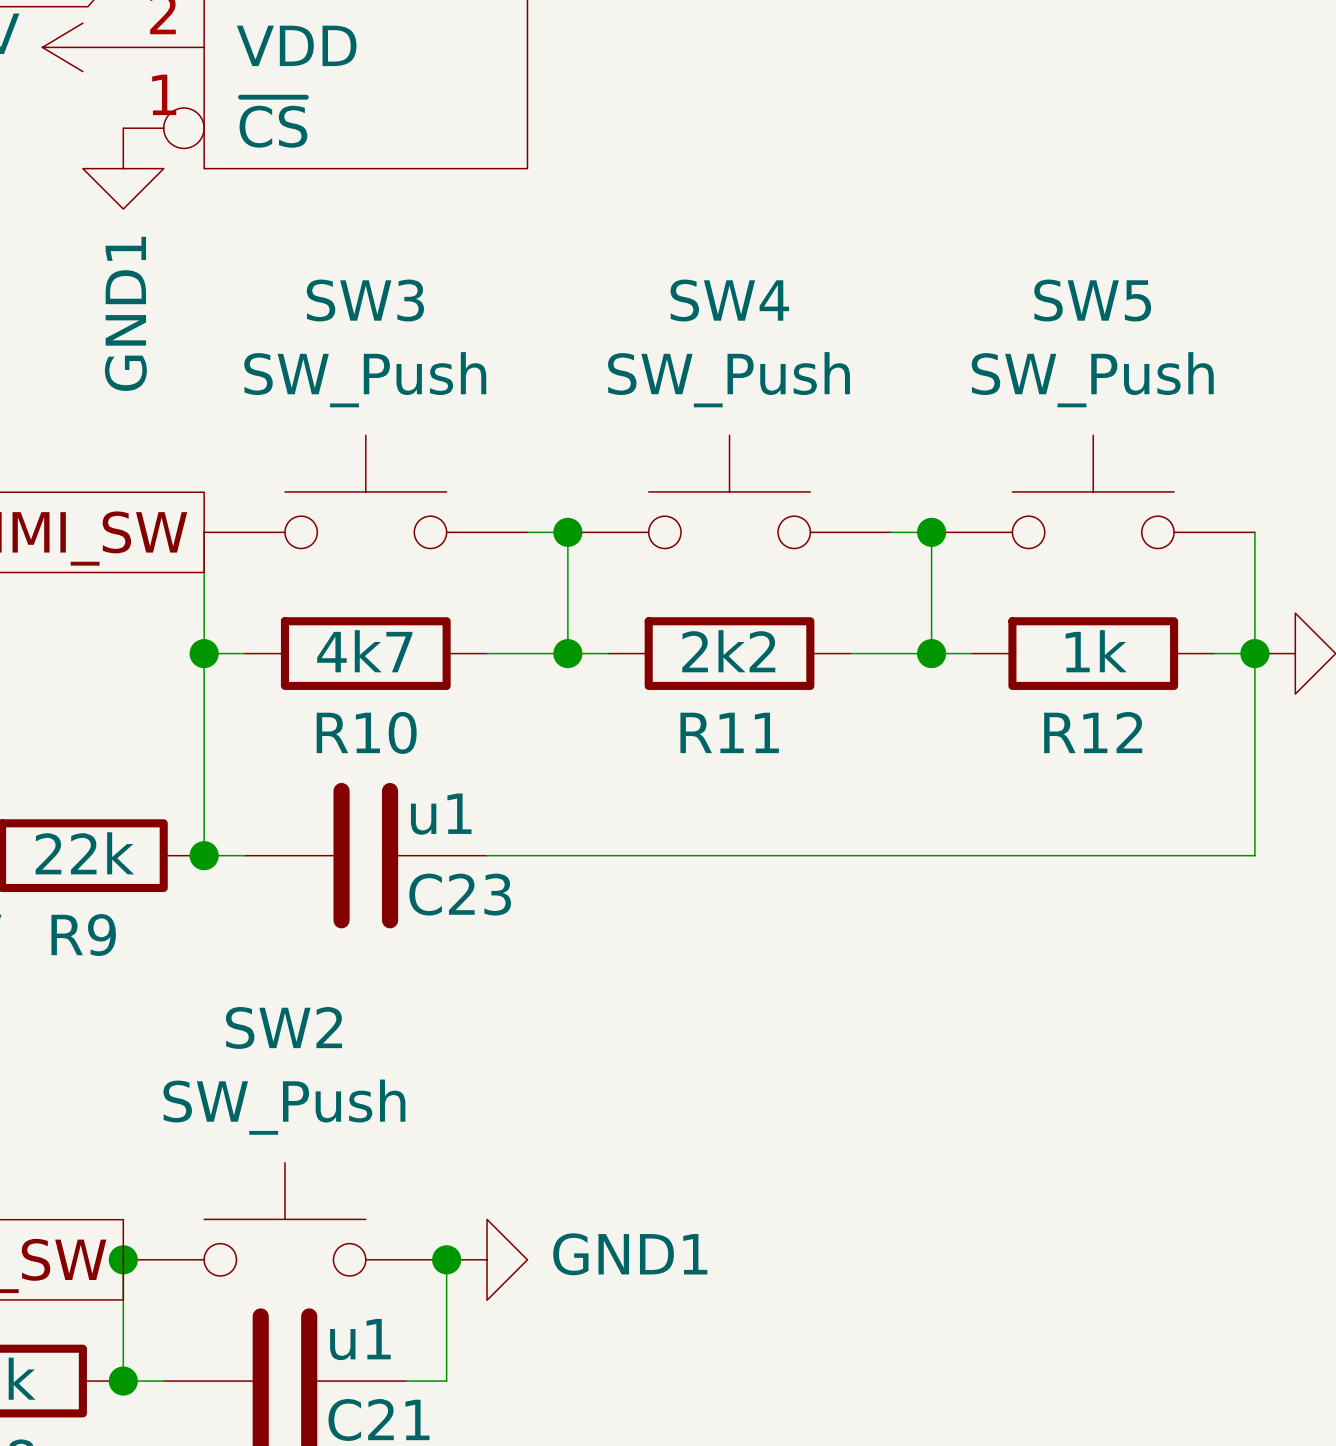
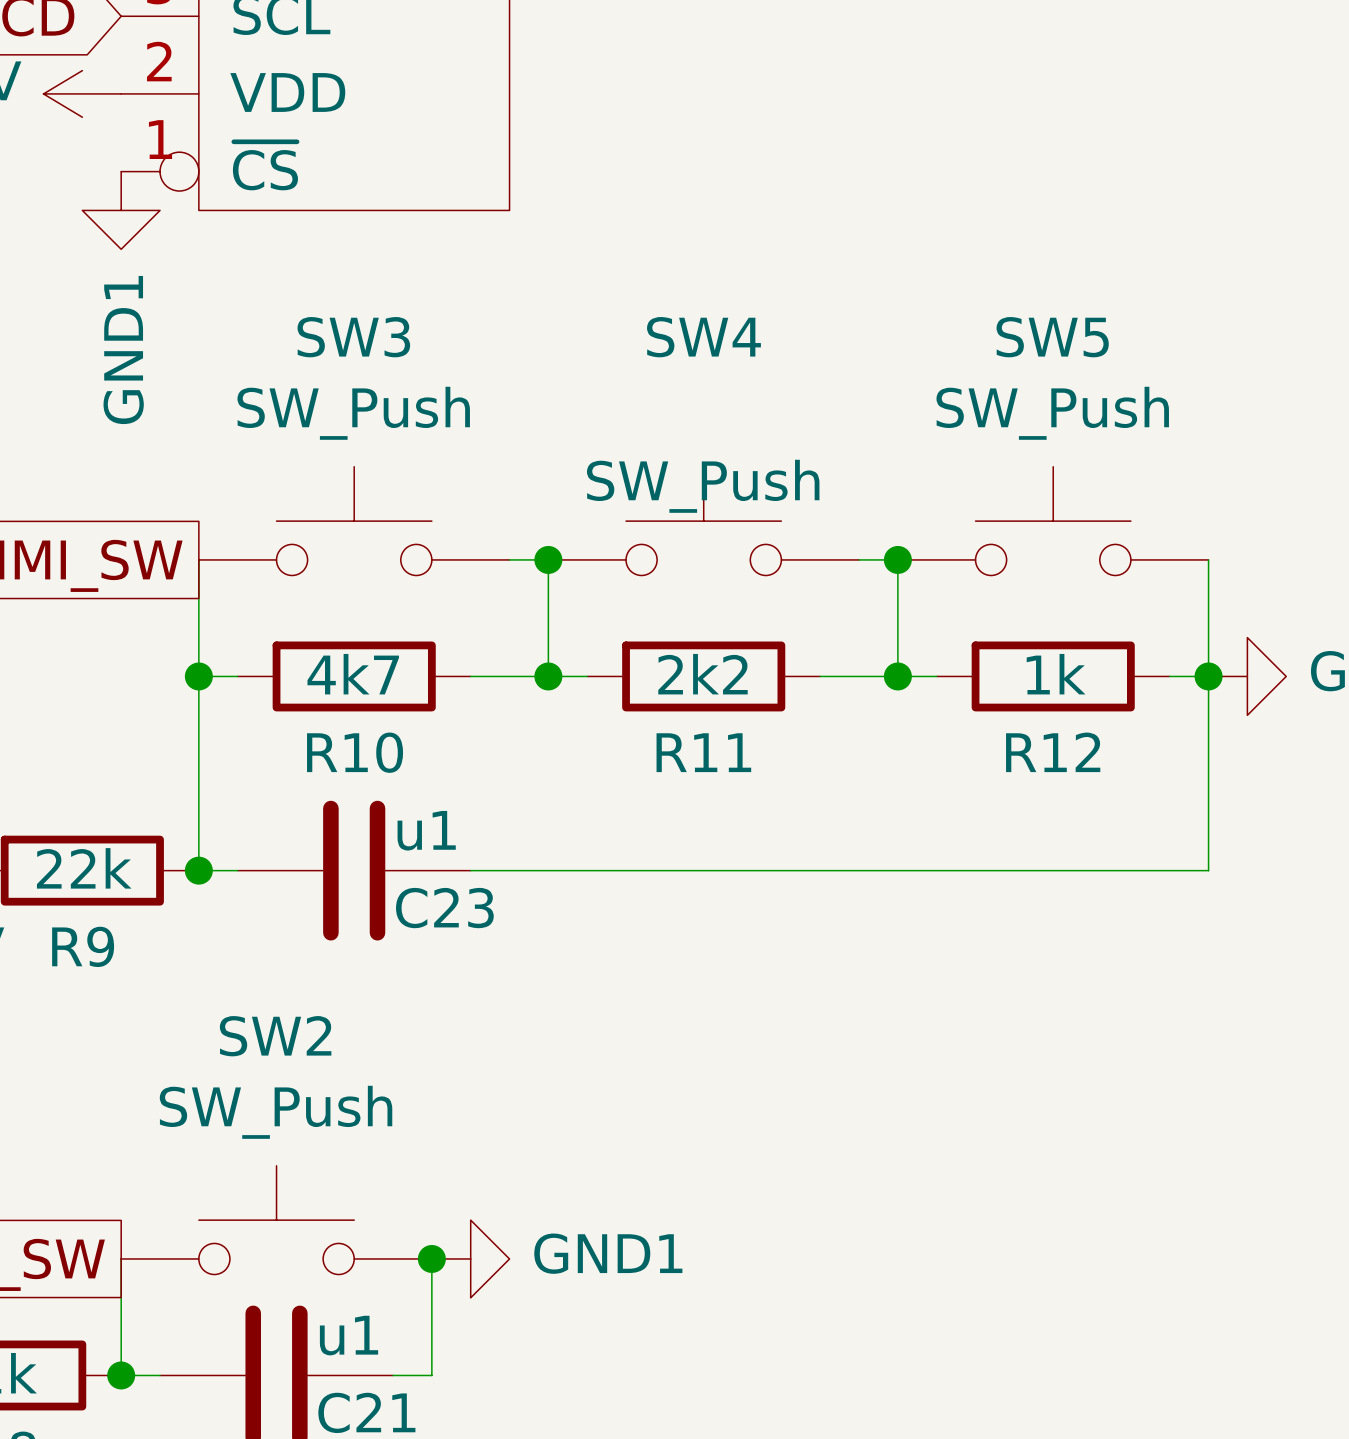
SW4 value position: SW_Push (729, 379) -> SW_Push (703, 486)
junction: (123, 1259) -> none

